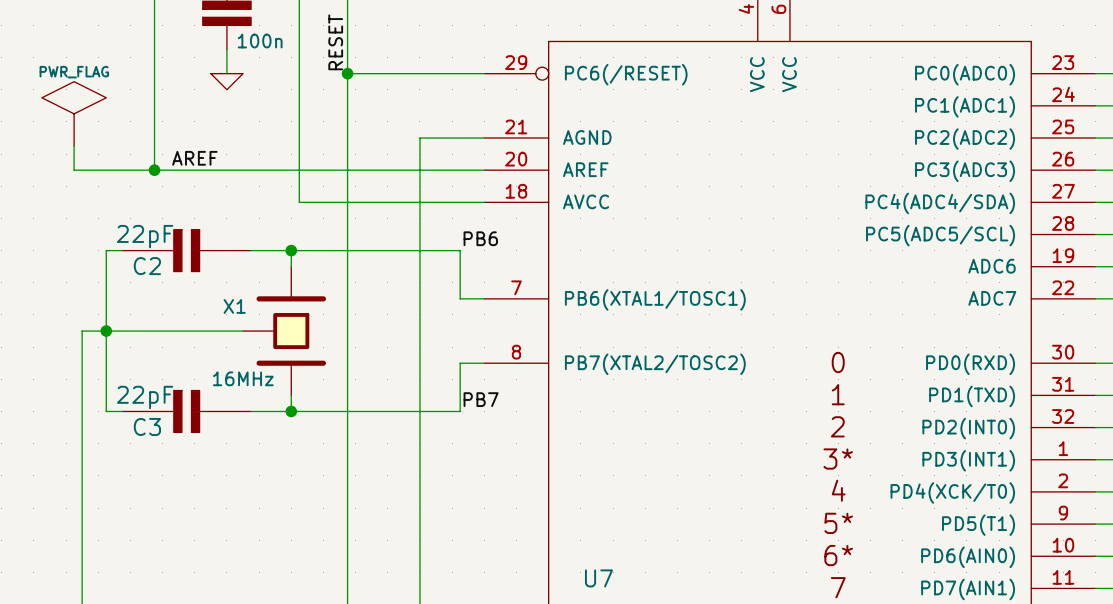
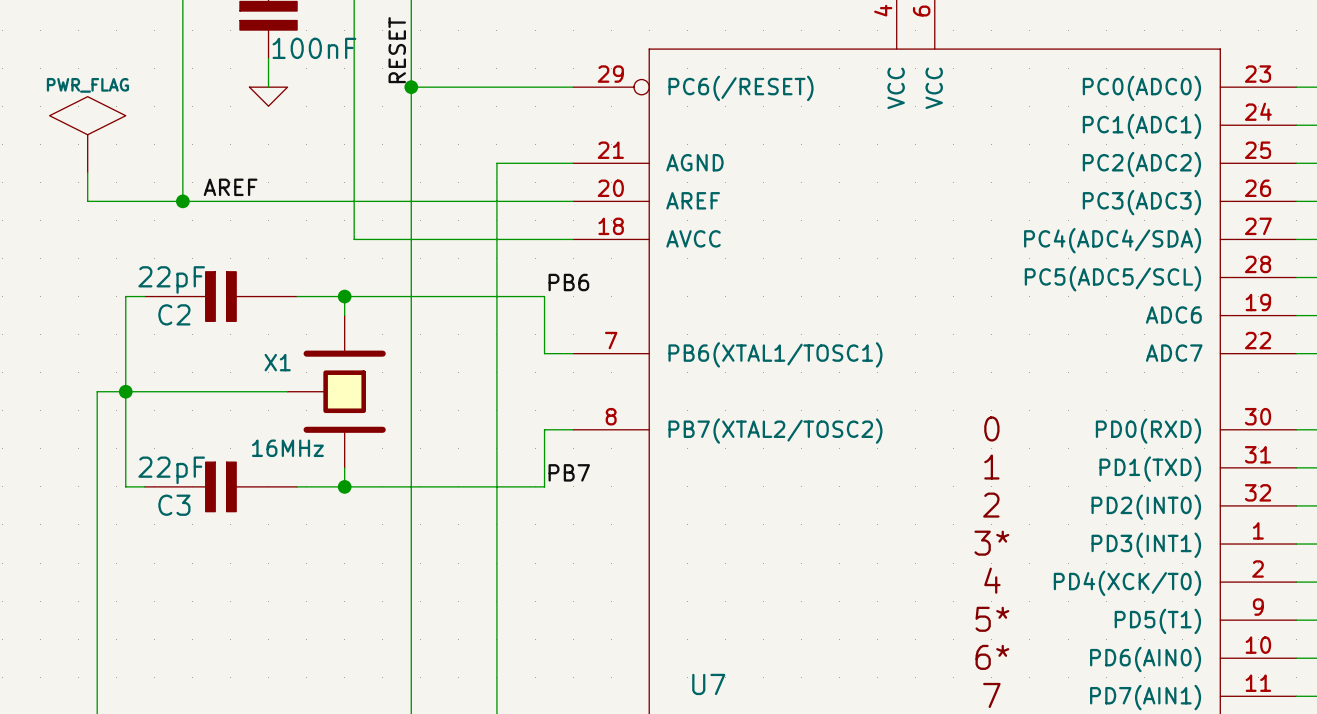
part value: 100n (260, 41) -> 100nF (314, 48)

